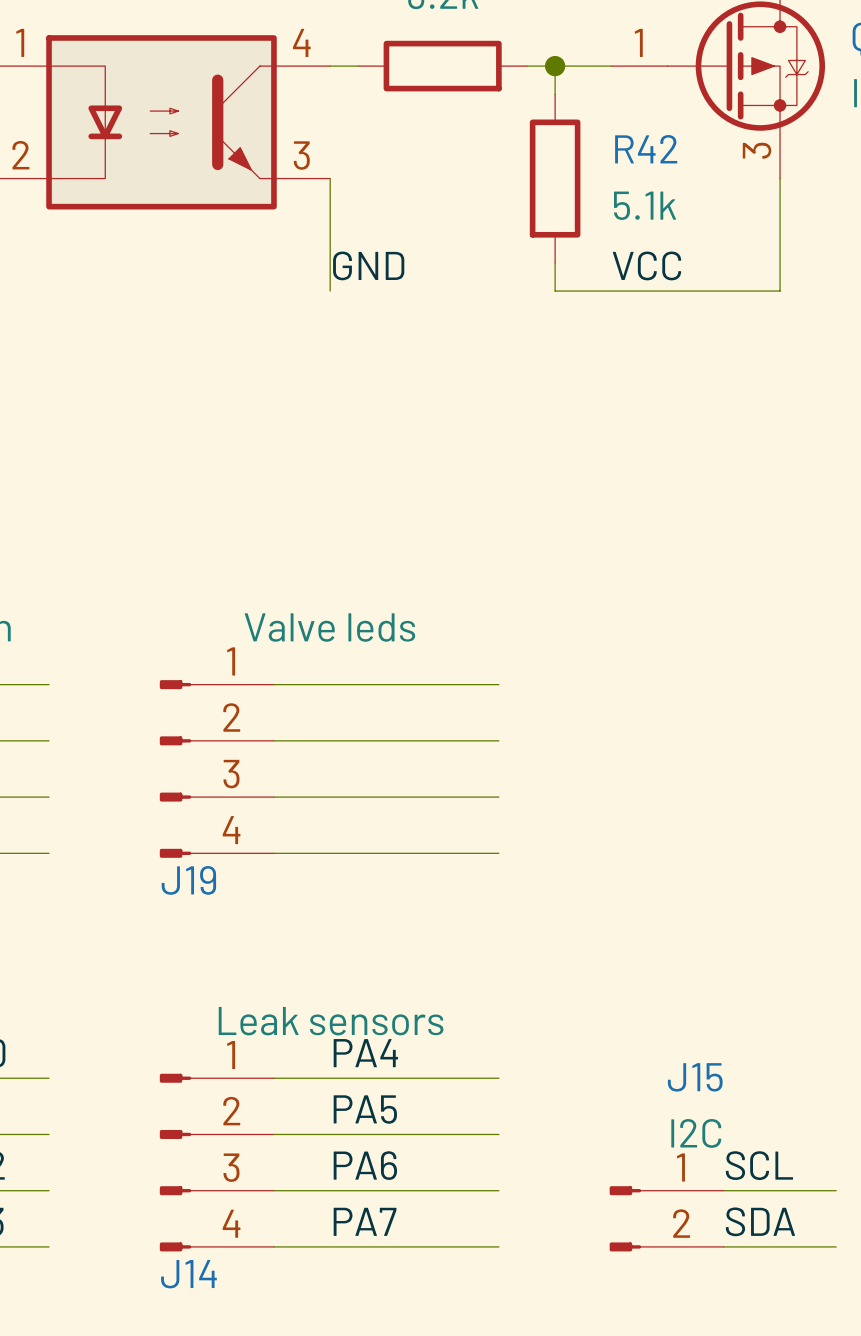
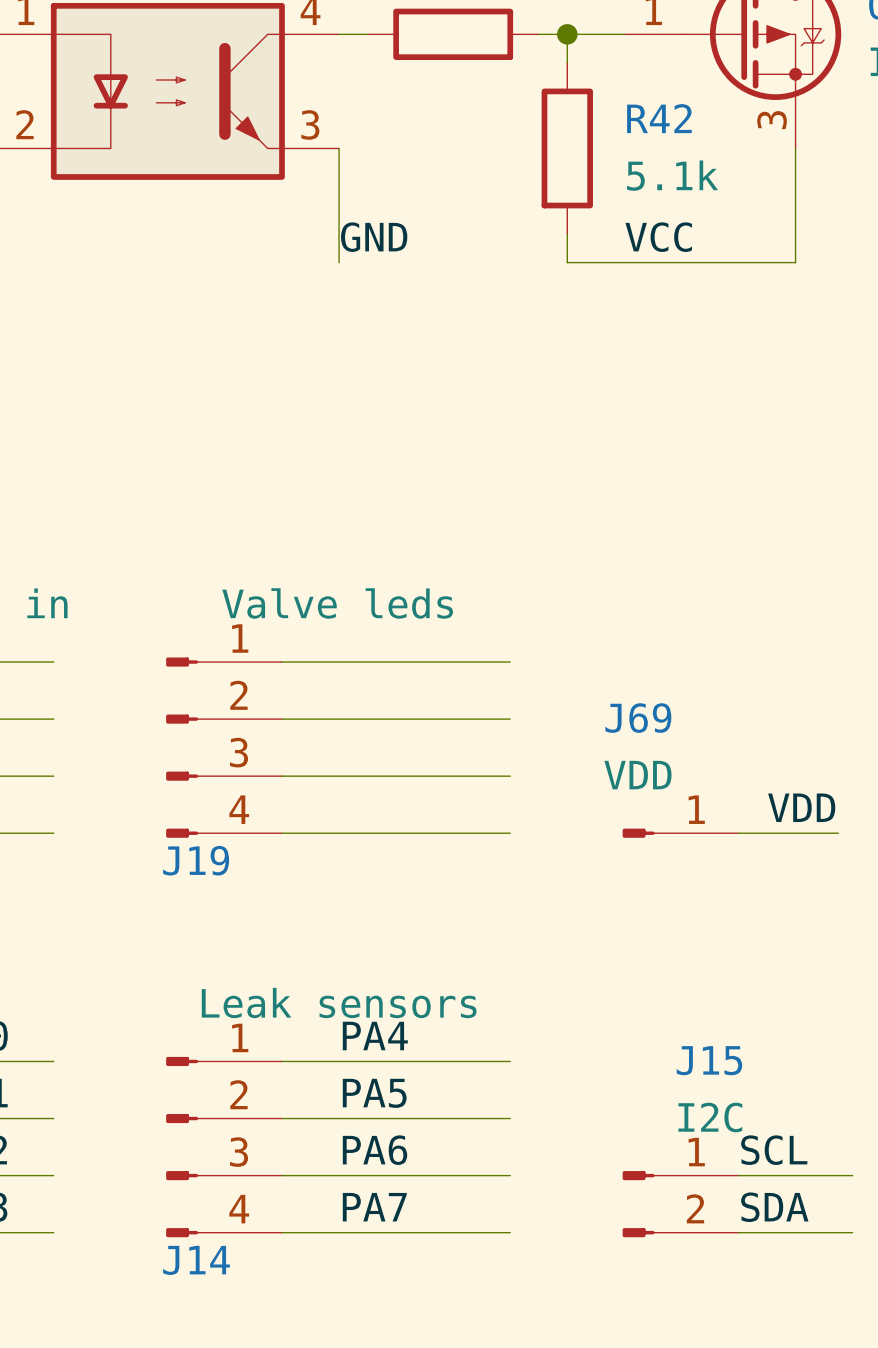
label: none -> VDD (801, 807)
J69: none -> VDD (680, 833)
wire: none -> (738, 833) (838, 833)

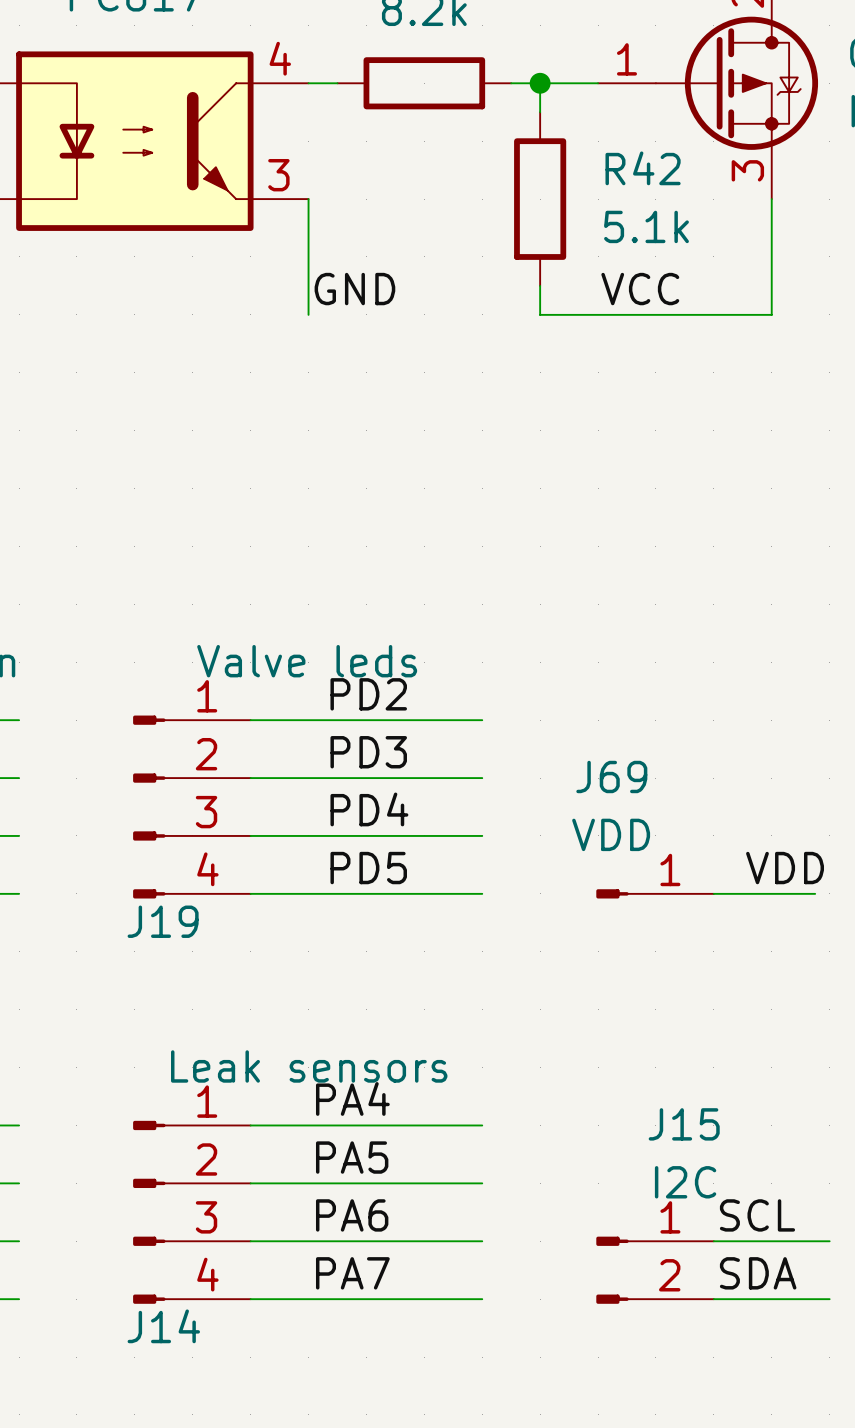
label: none -> PD2 (368, 694)
label: none -> PD3 (368, 752)
label: none -> PD4 (369, 809)
label: none -> PD5 (368, 868)

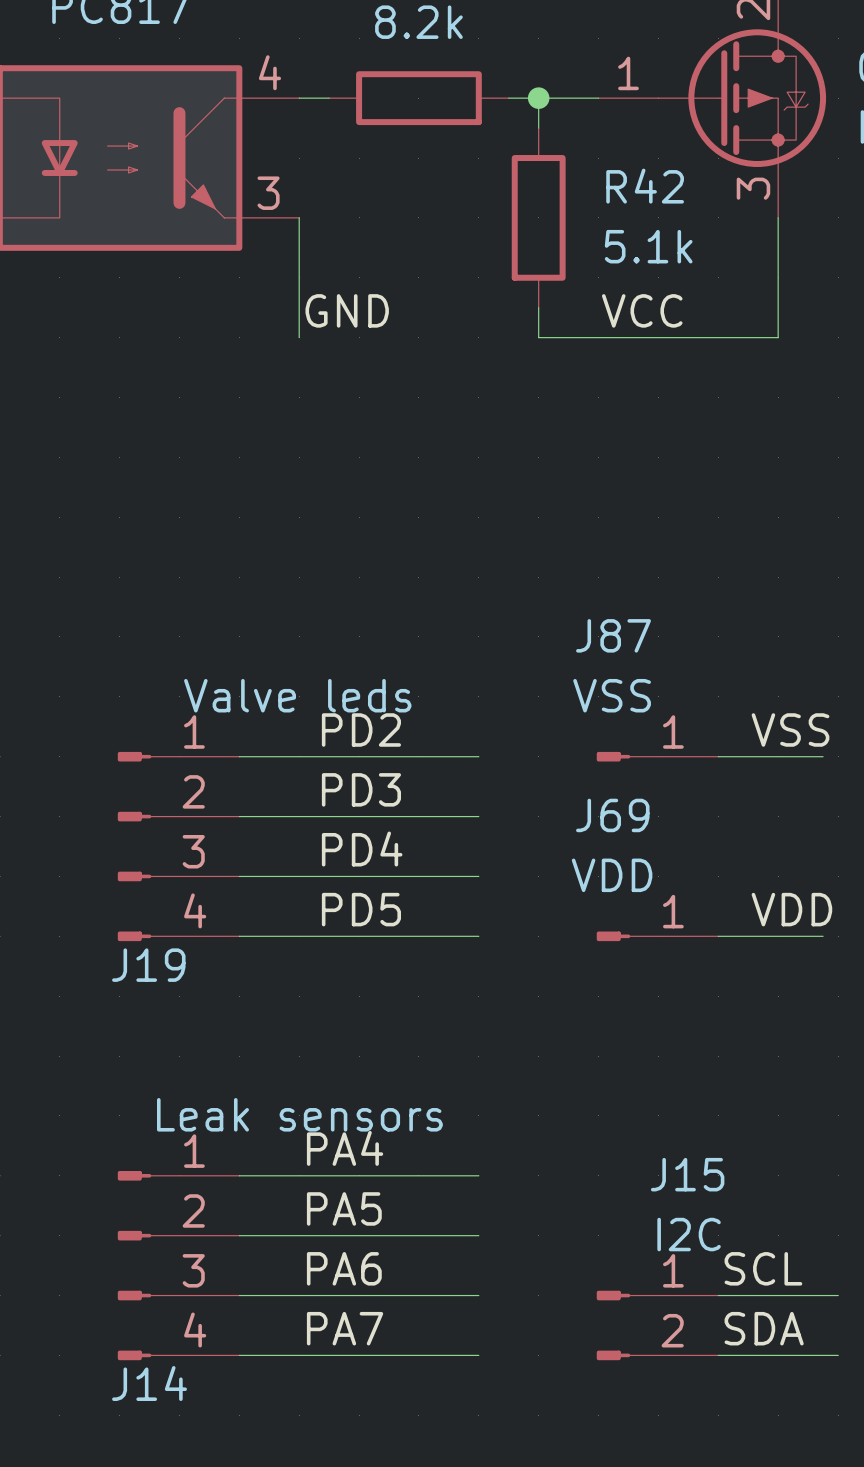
label: none -> VSS (790, 729)
J87: none -> VSS (657, 756)
wire: none -> (718, 756) (823, 756)

